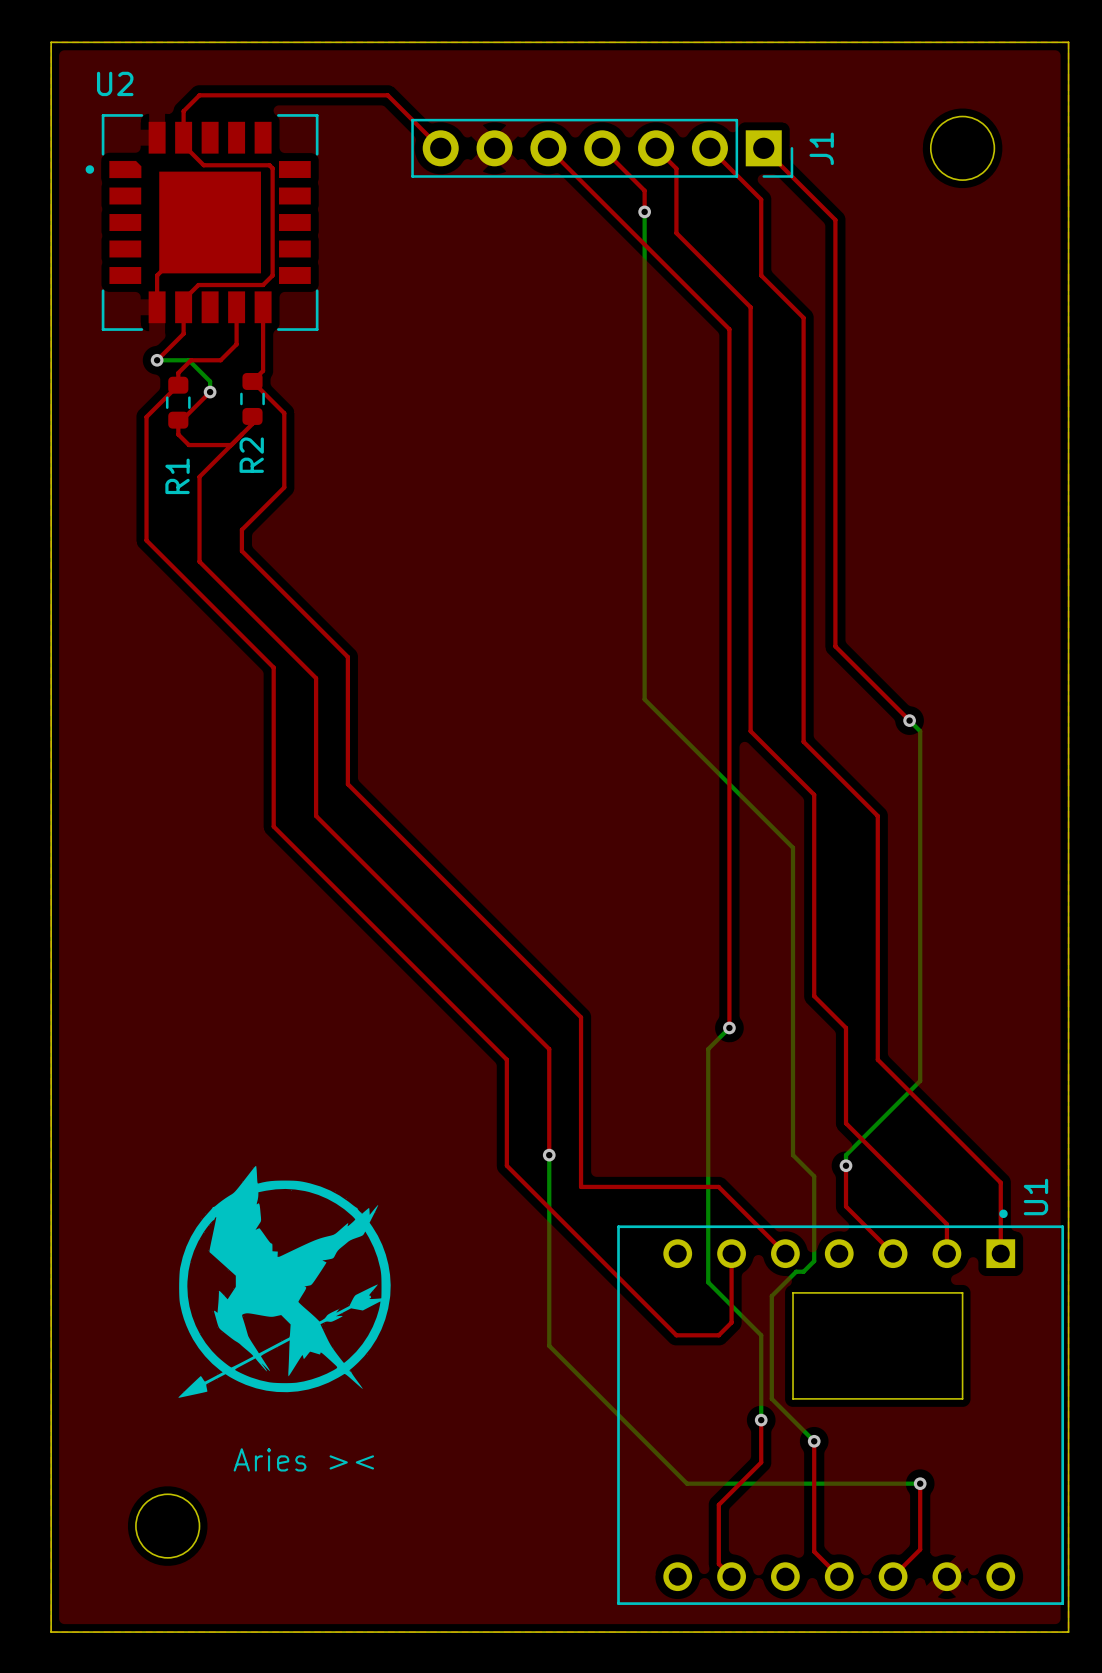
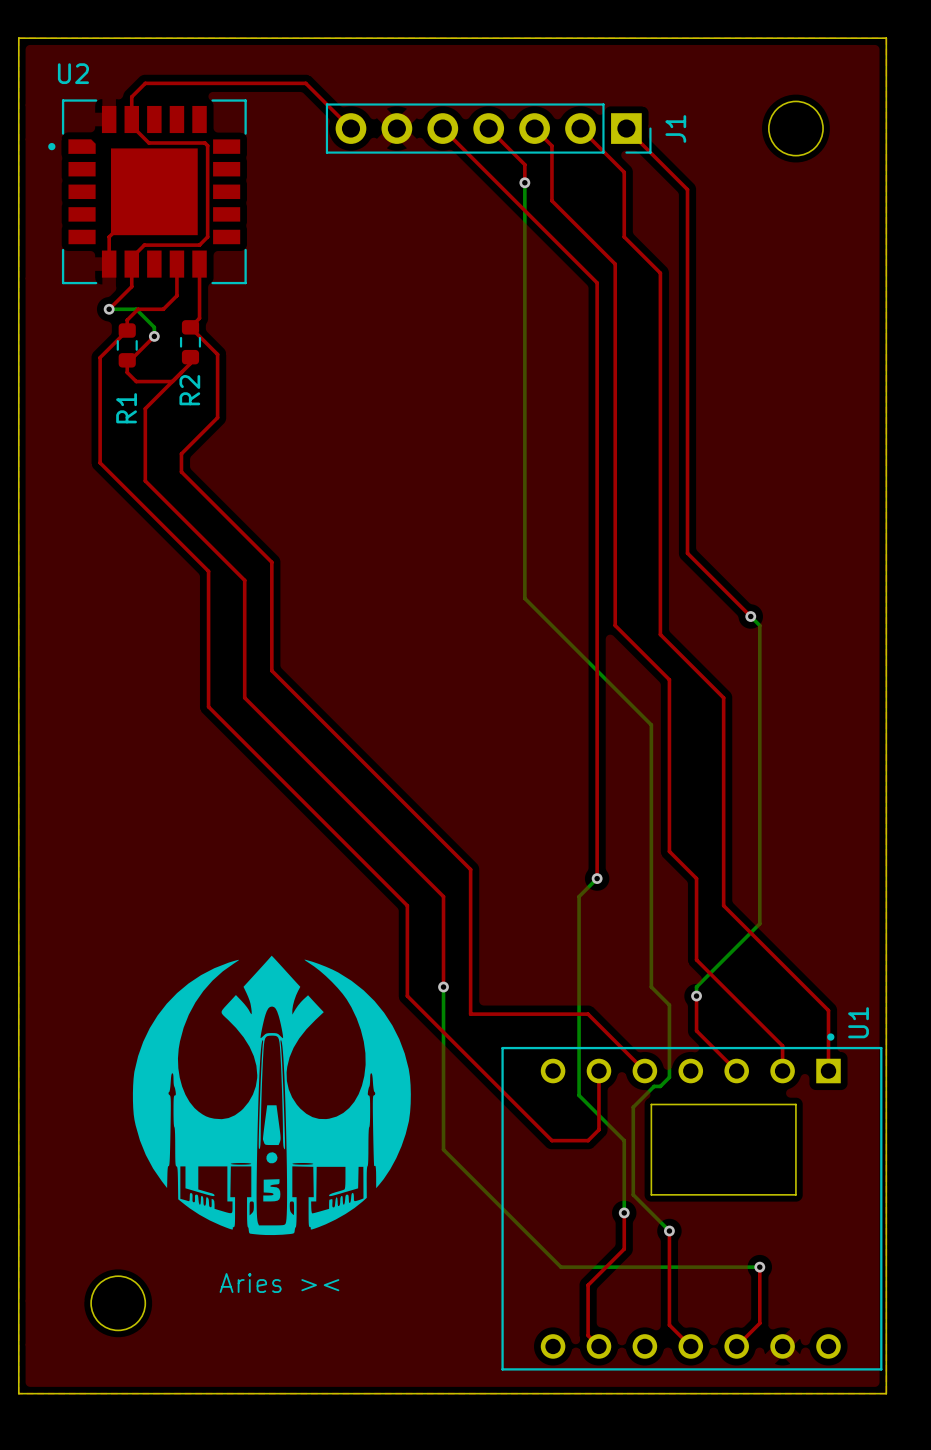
drawing: none -> [132, 955, 411, 1236]
drawing: [178, 1165, 391, 1398] -> none
text position: Aries >< (303, 1459) -> Aries >< (279, 1283)

